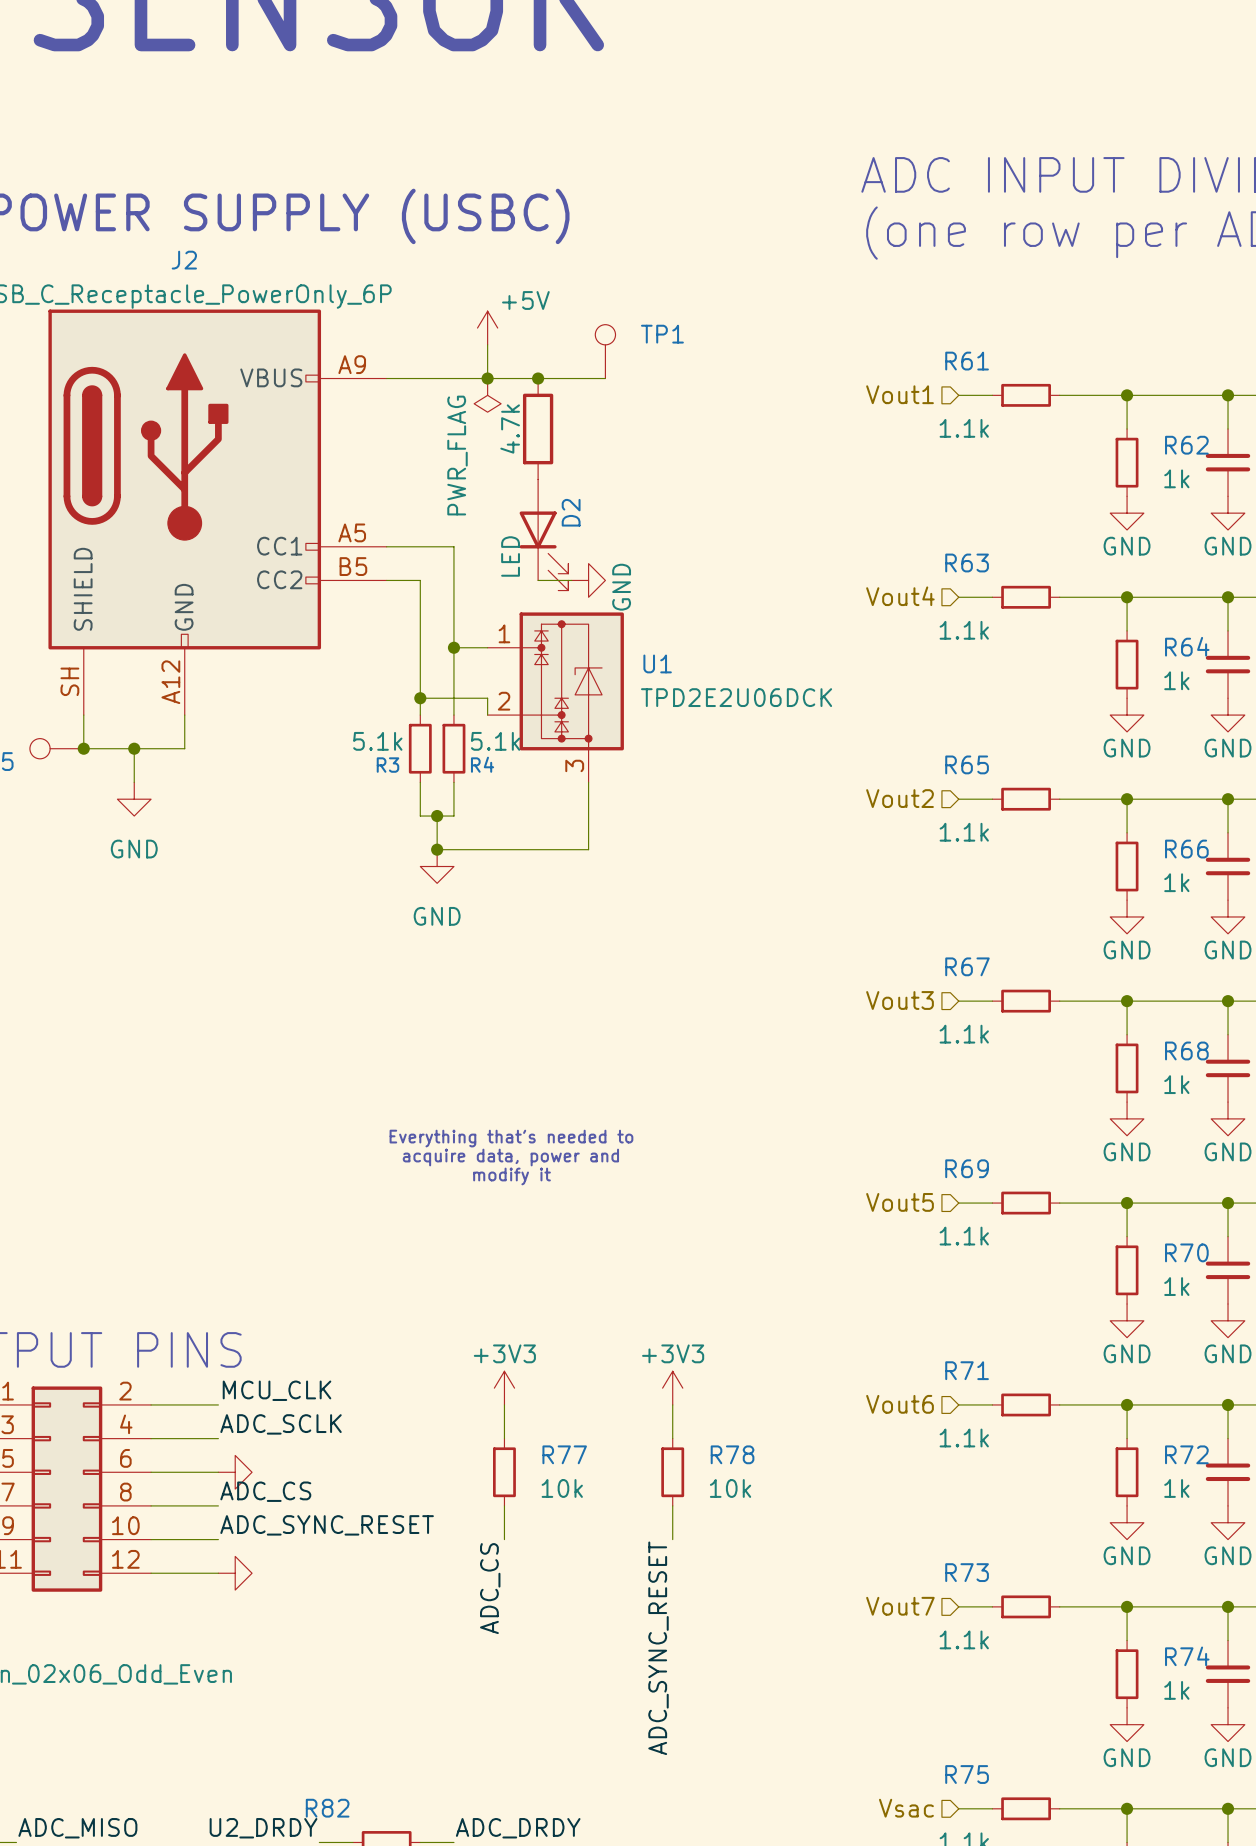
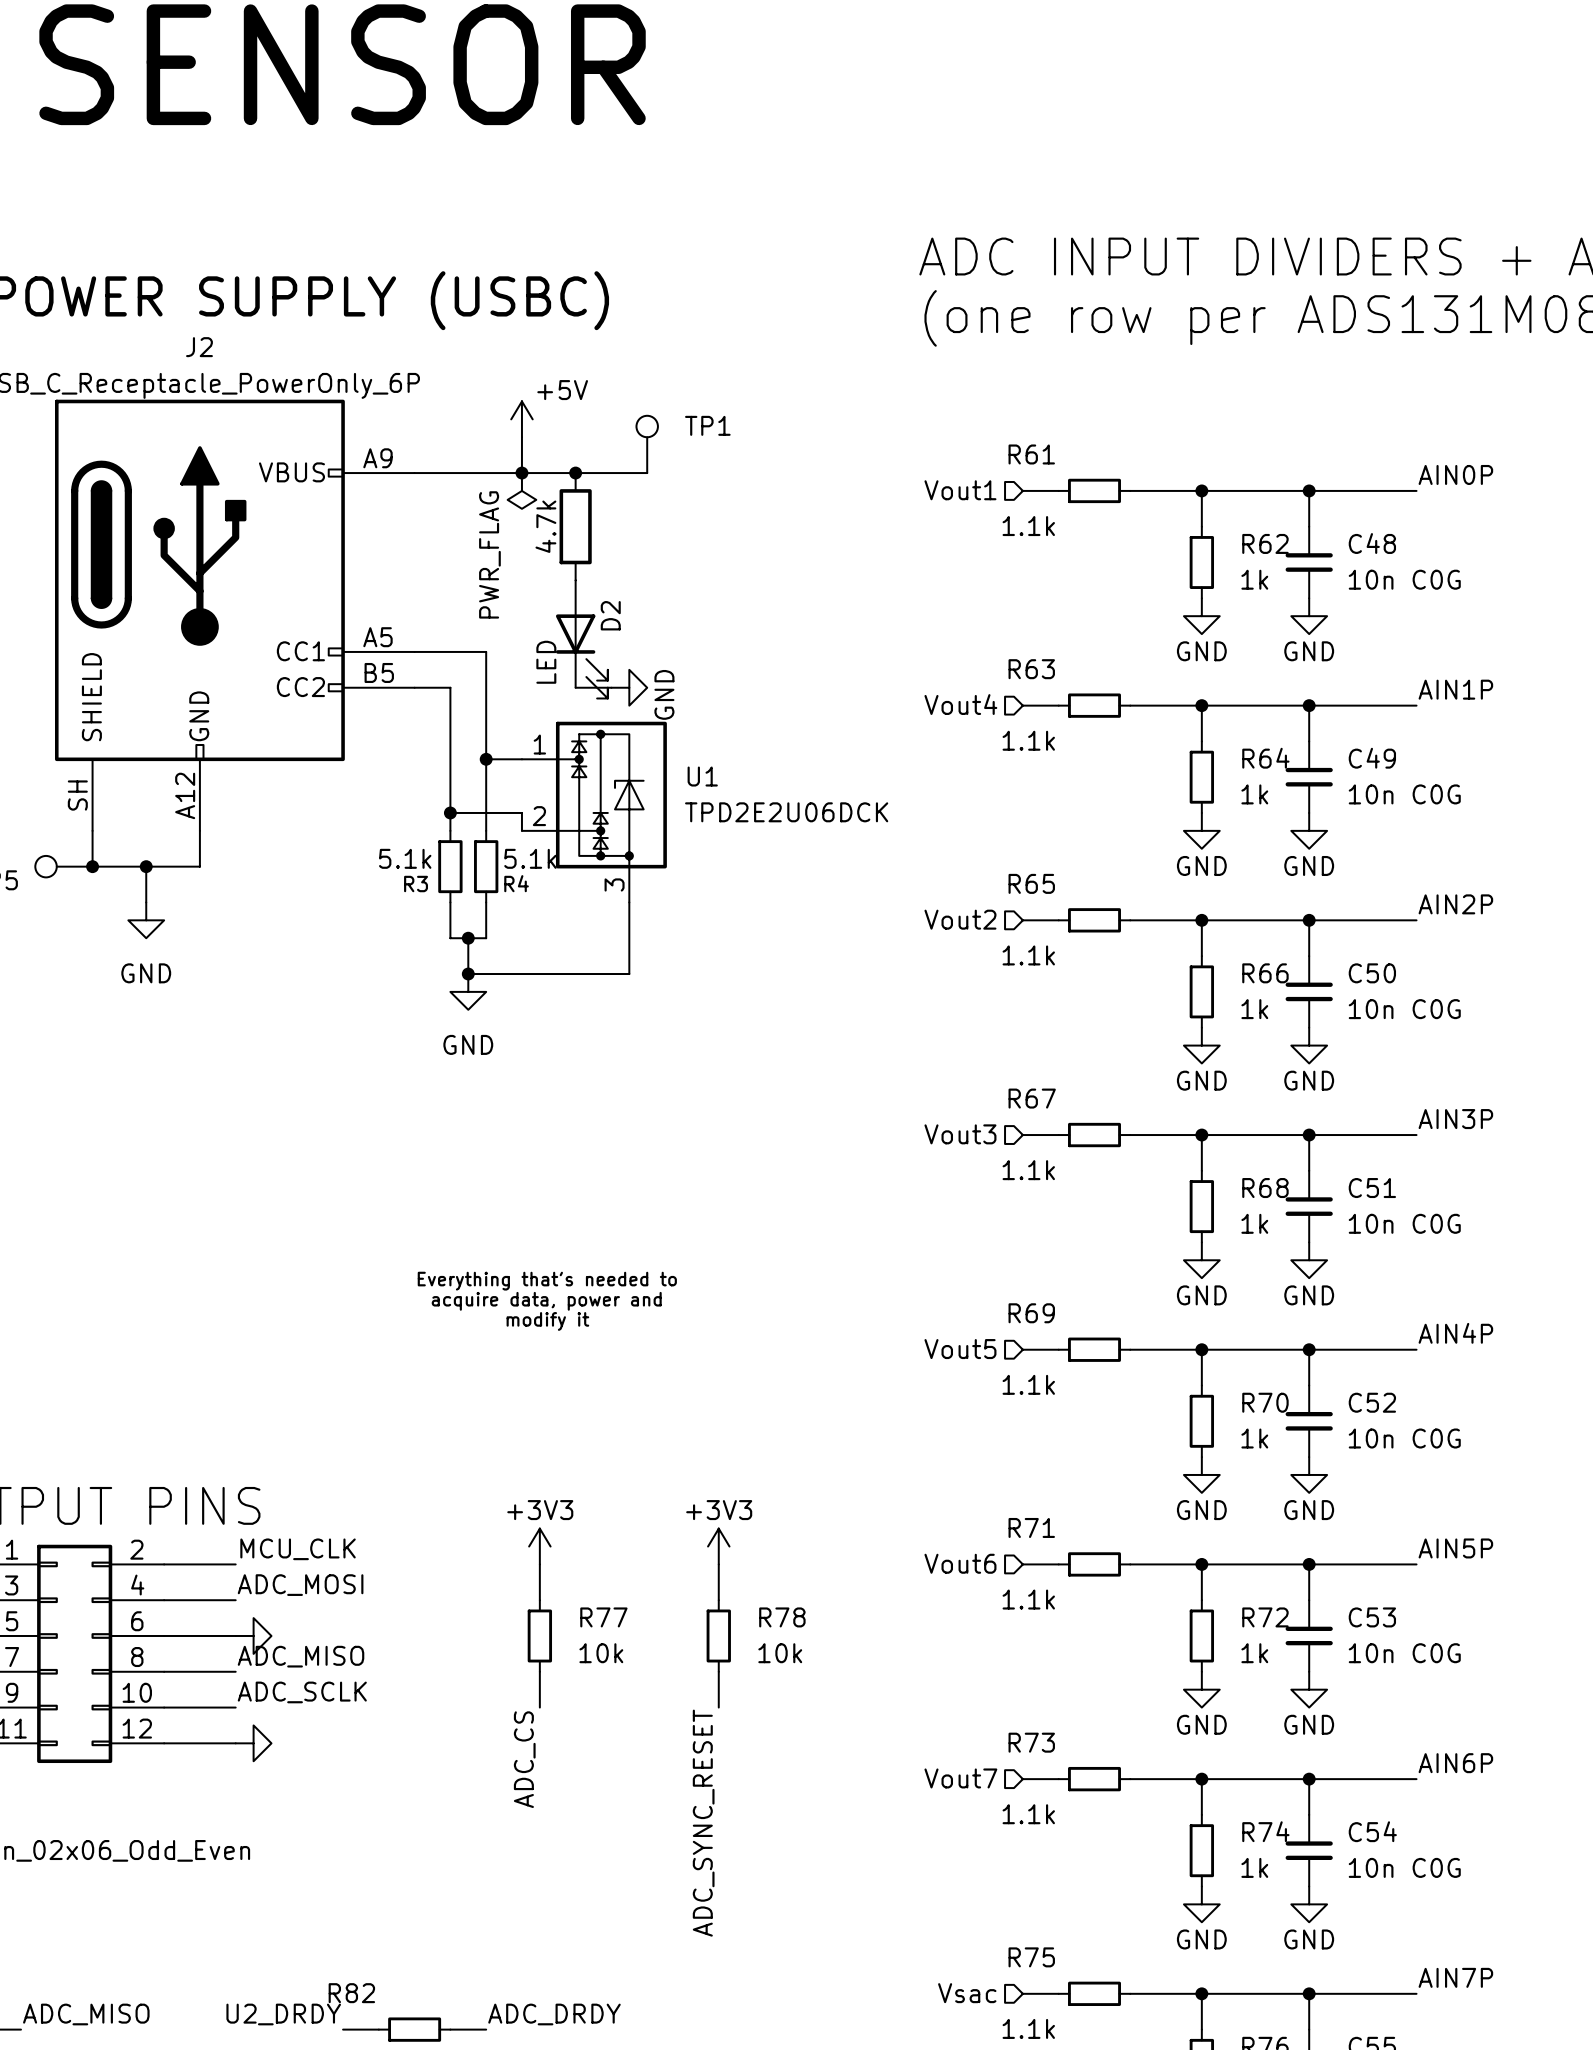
label: ADC_SCLK (281, 1424) -> ADC_MOSI (300, 1585)
label: ADC_CS (265, 1491) -> ADC_MISO (301, 1656)
label: ADC_SYNC_RESET (327, 1525) -> ADC_SCLK (302, 1692)

